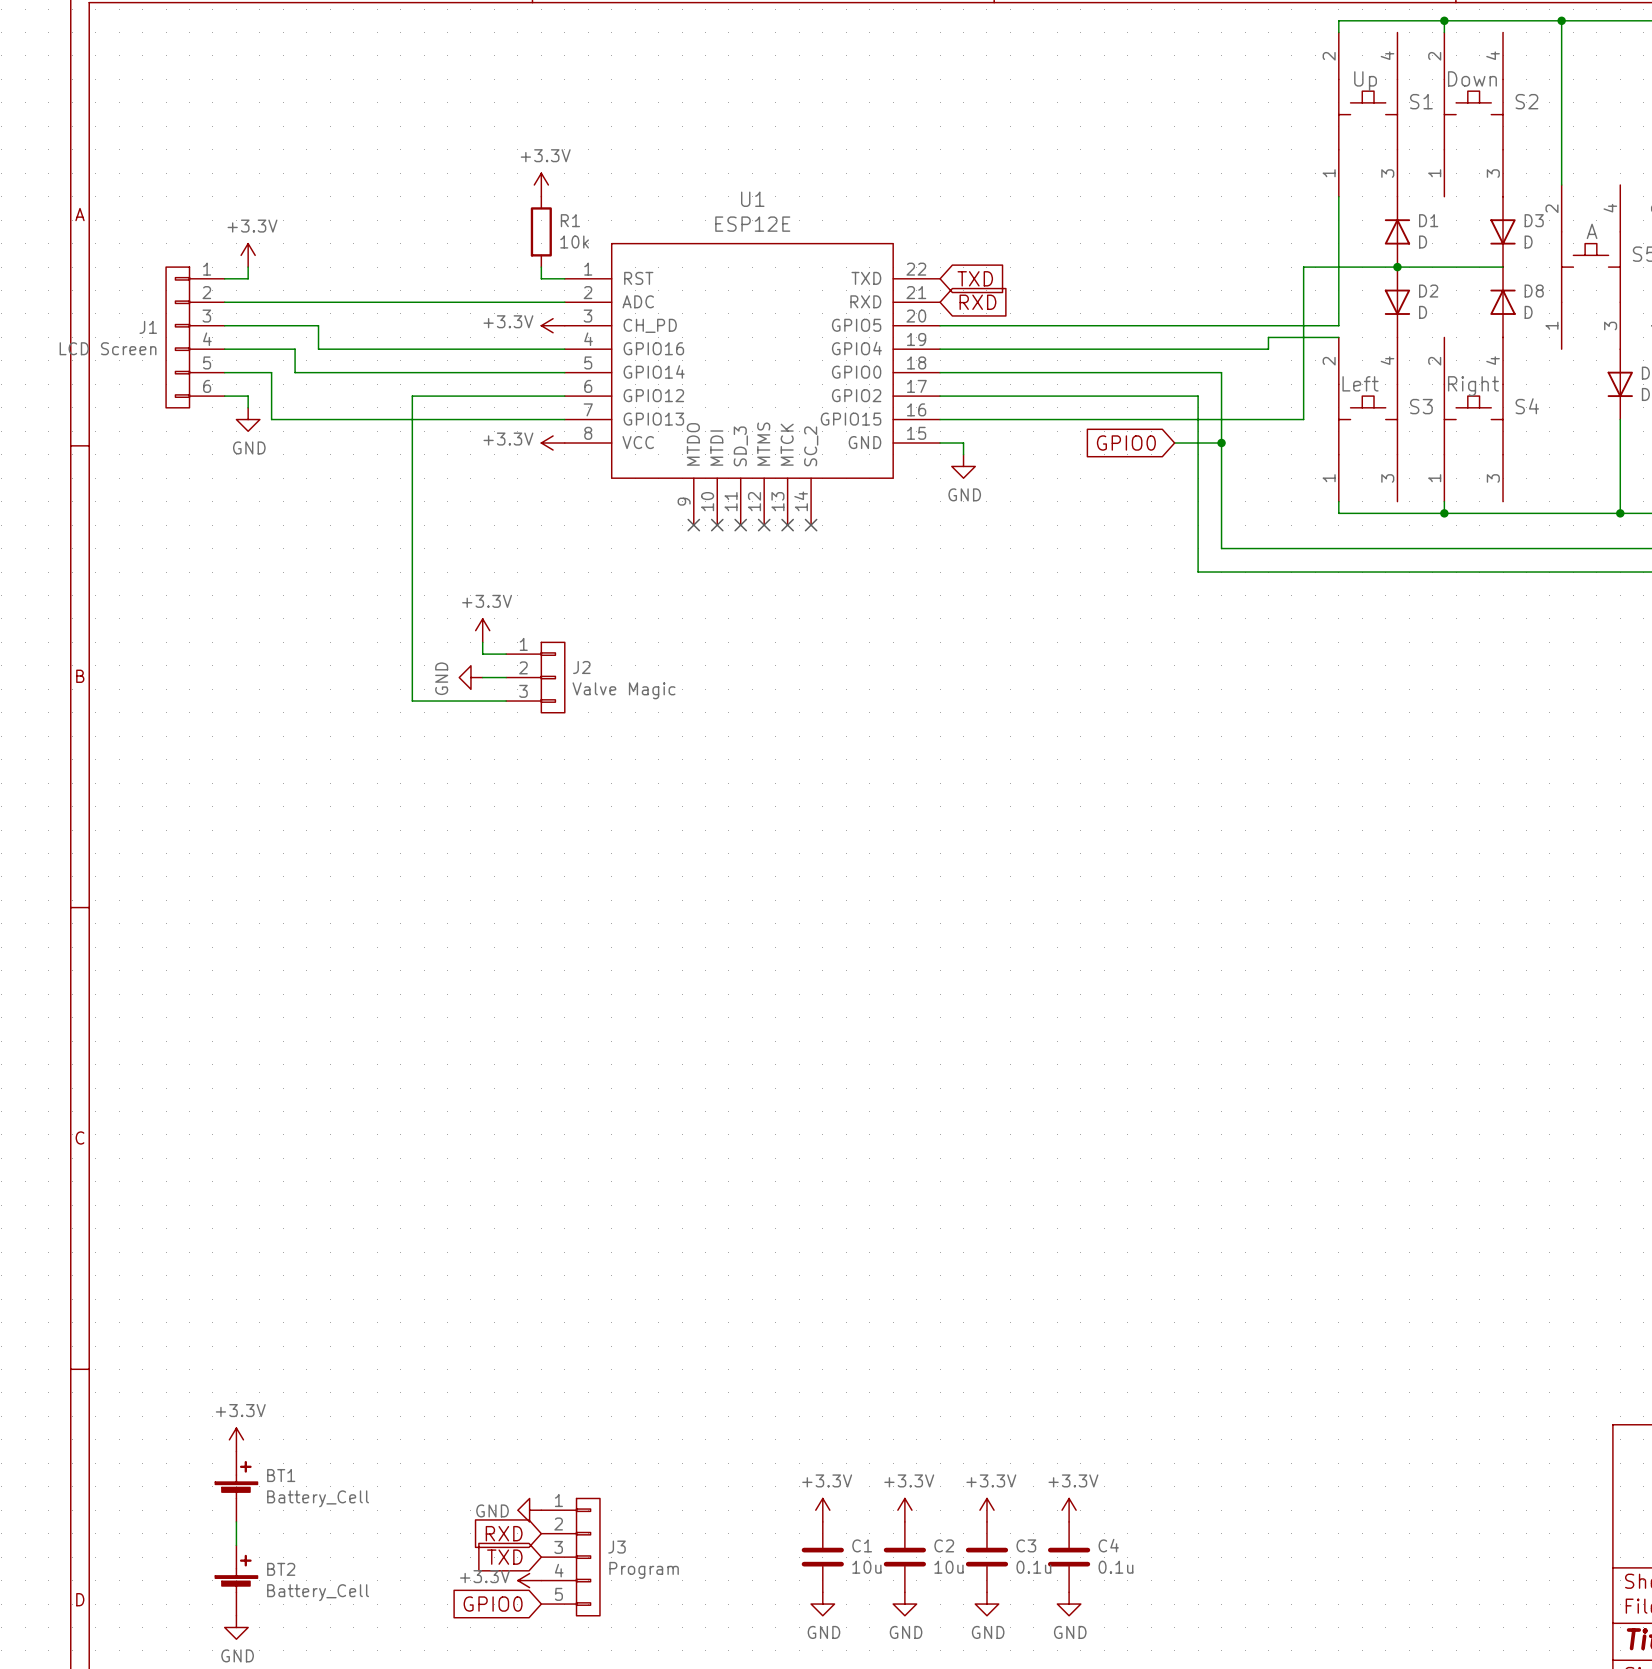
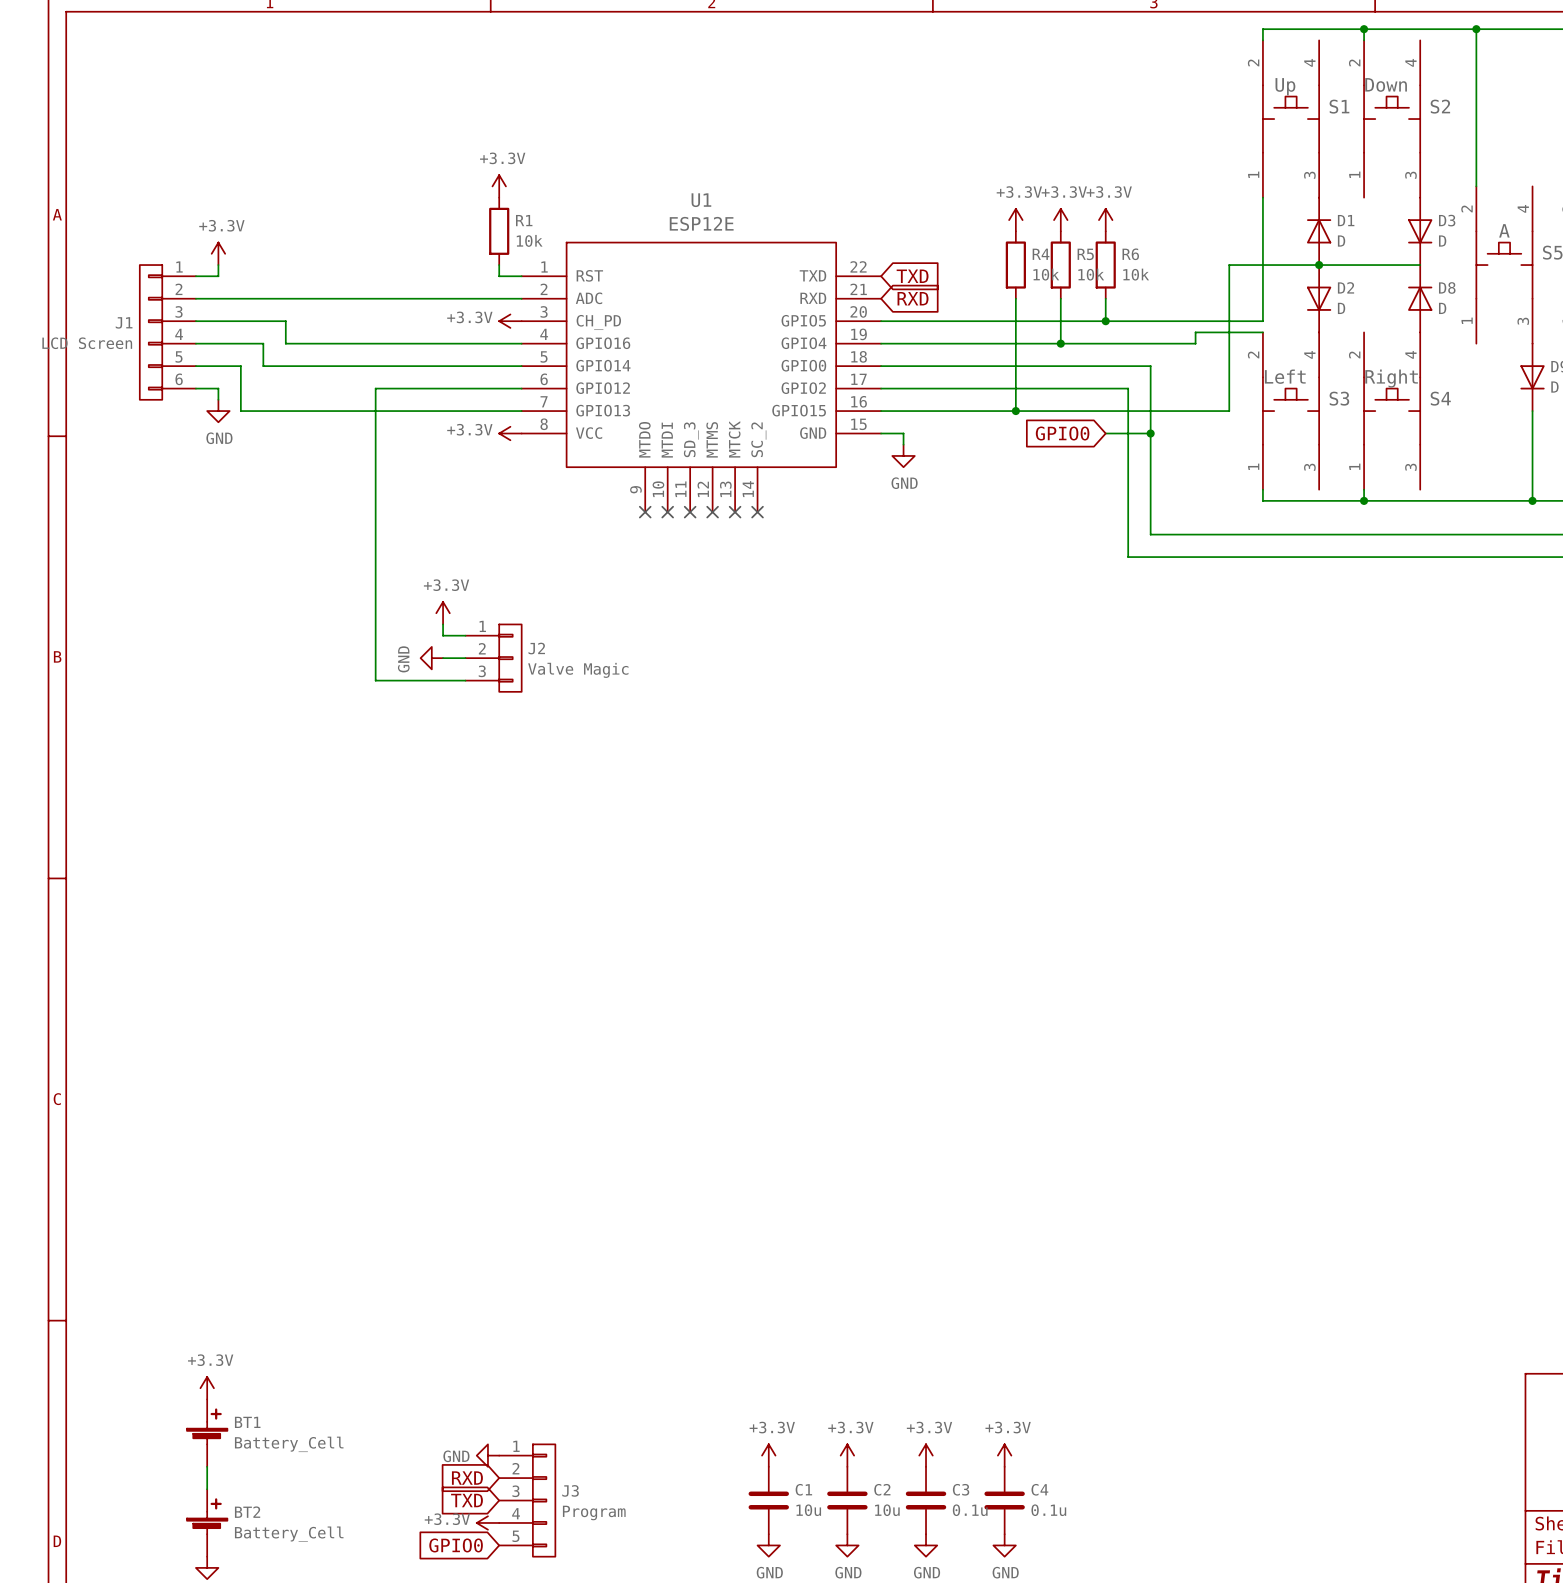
power symbol: none -> +3.3V (1015, 220)
power symbol: none -> +3.3V (1060, 220)
power symbol: none -> +3.3V (1105, 220)
R4: none -> 10k (1015, 265)
R5: none -> 10k (1060, 265)
R6: none -> 10k (1105, 265)
wire: none -> (1015, 298) (1015, 411)
wire: none -> (1060, 298) (1060, 343)
wire: none -> (1105, 298) (1105, 321)
junction: none -> (1105, 321)
junction: none -> (1060, 343)
junction: none -> (1015, 411)

